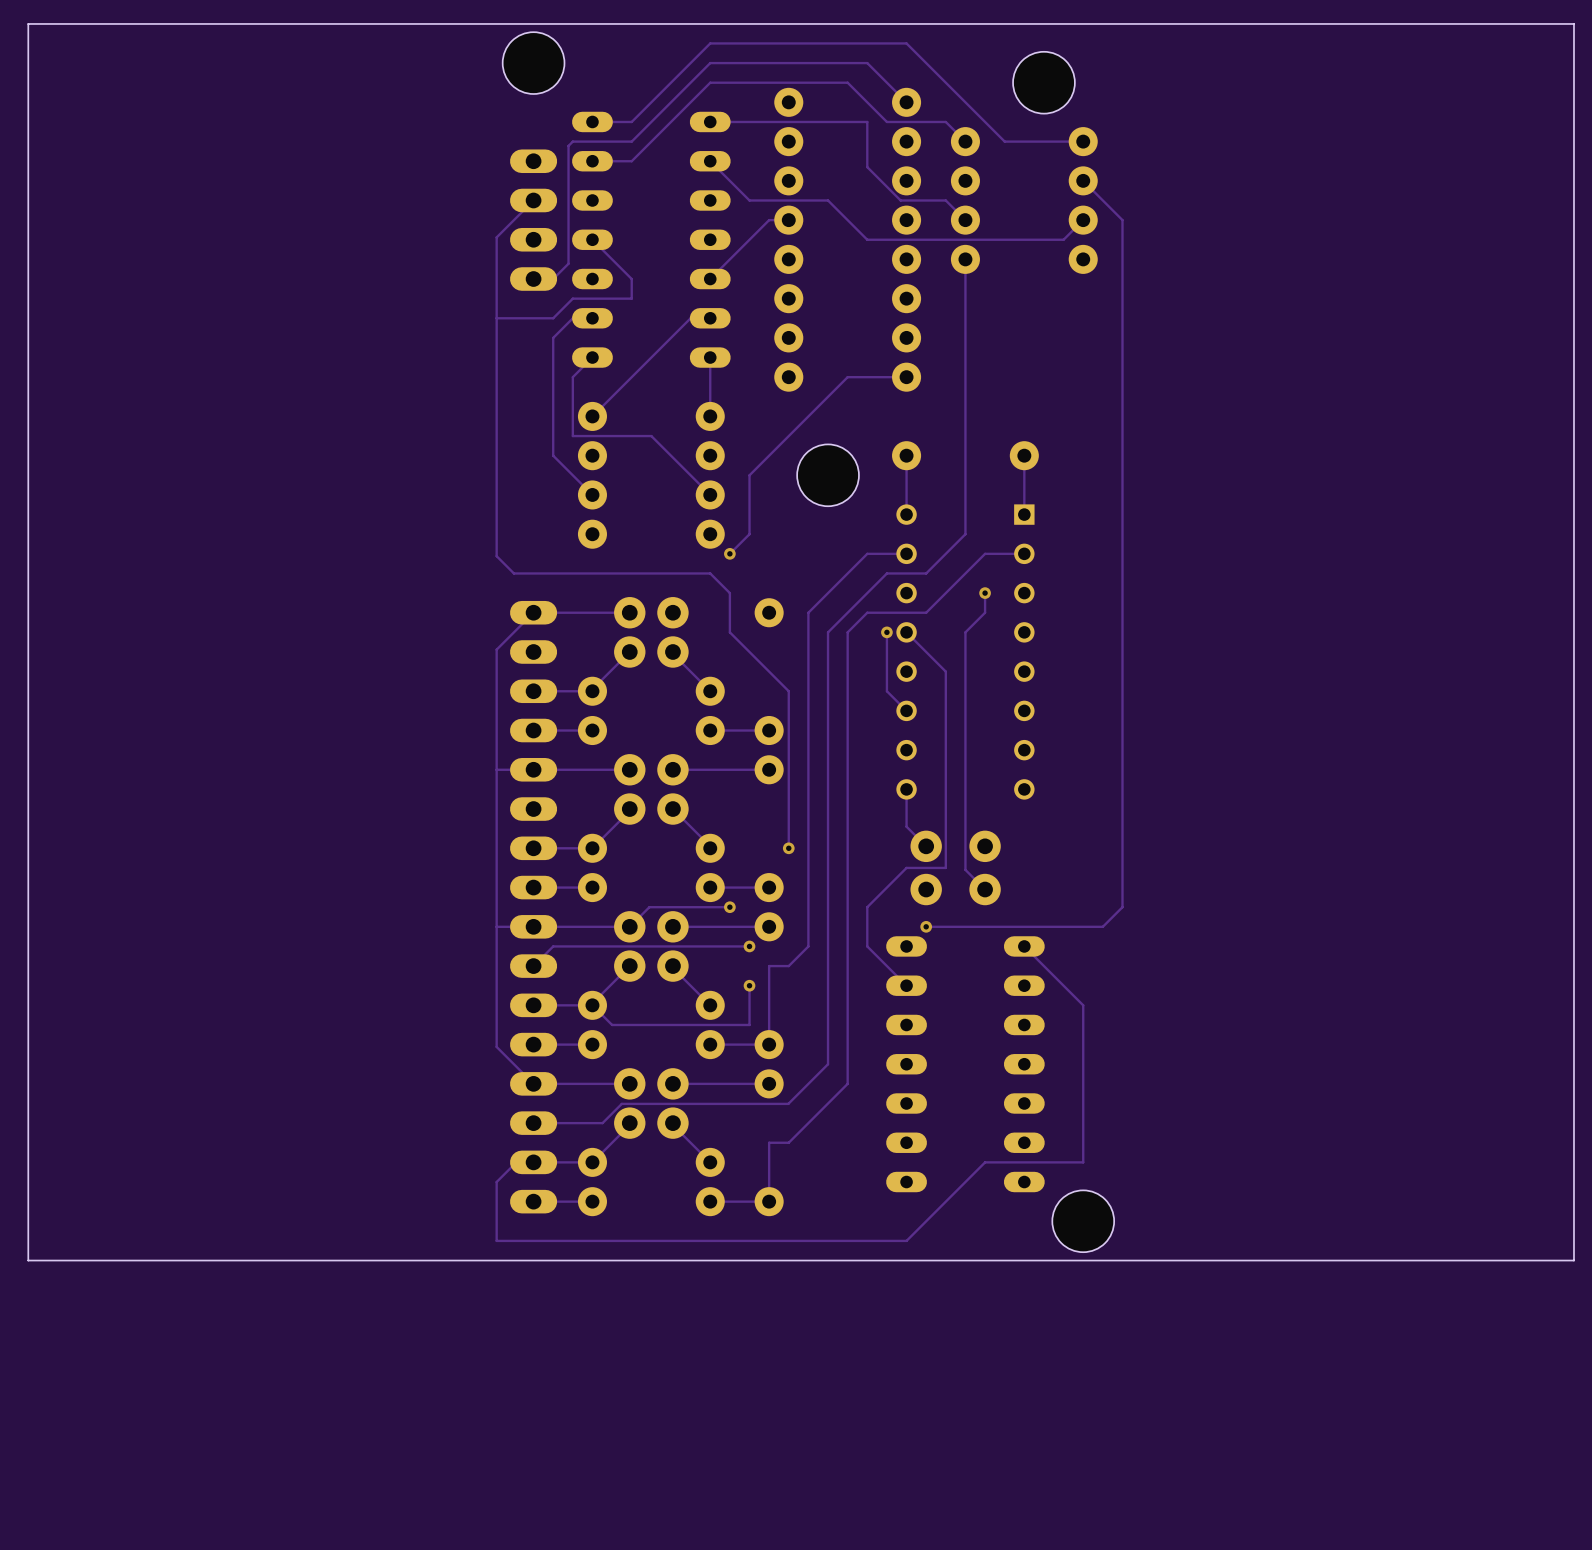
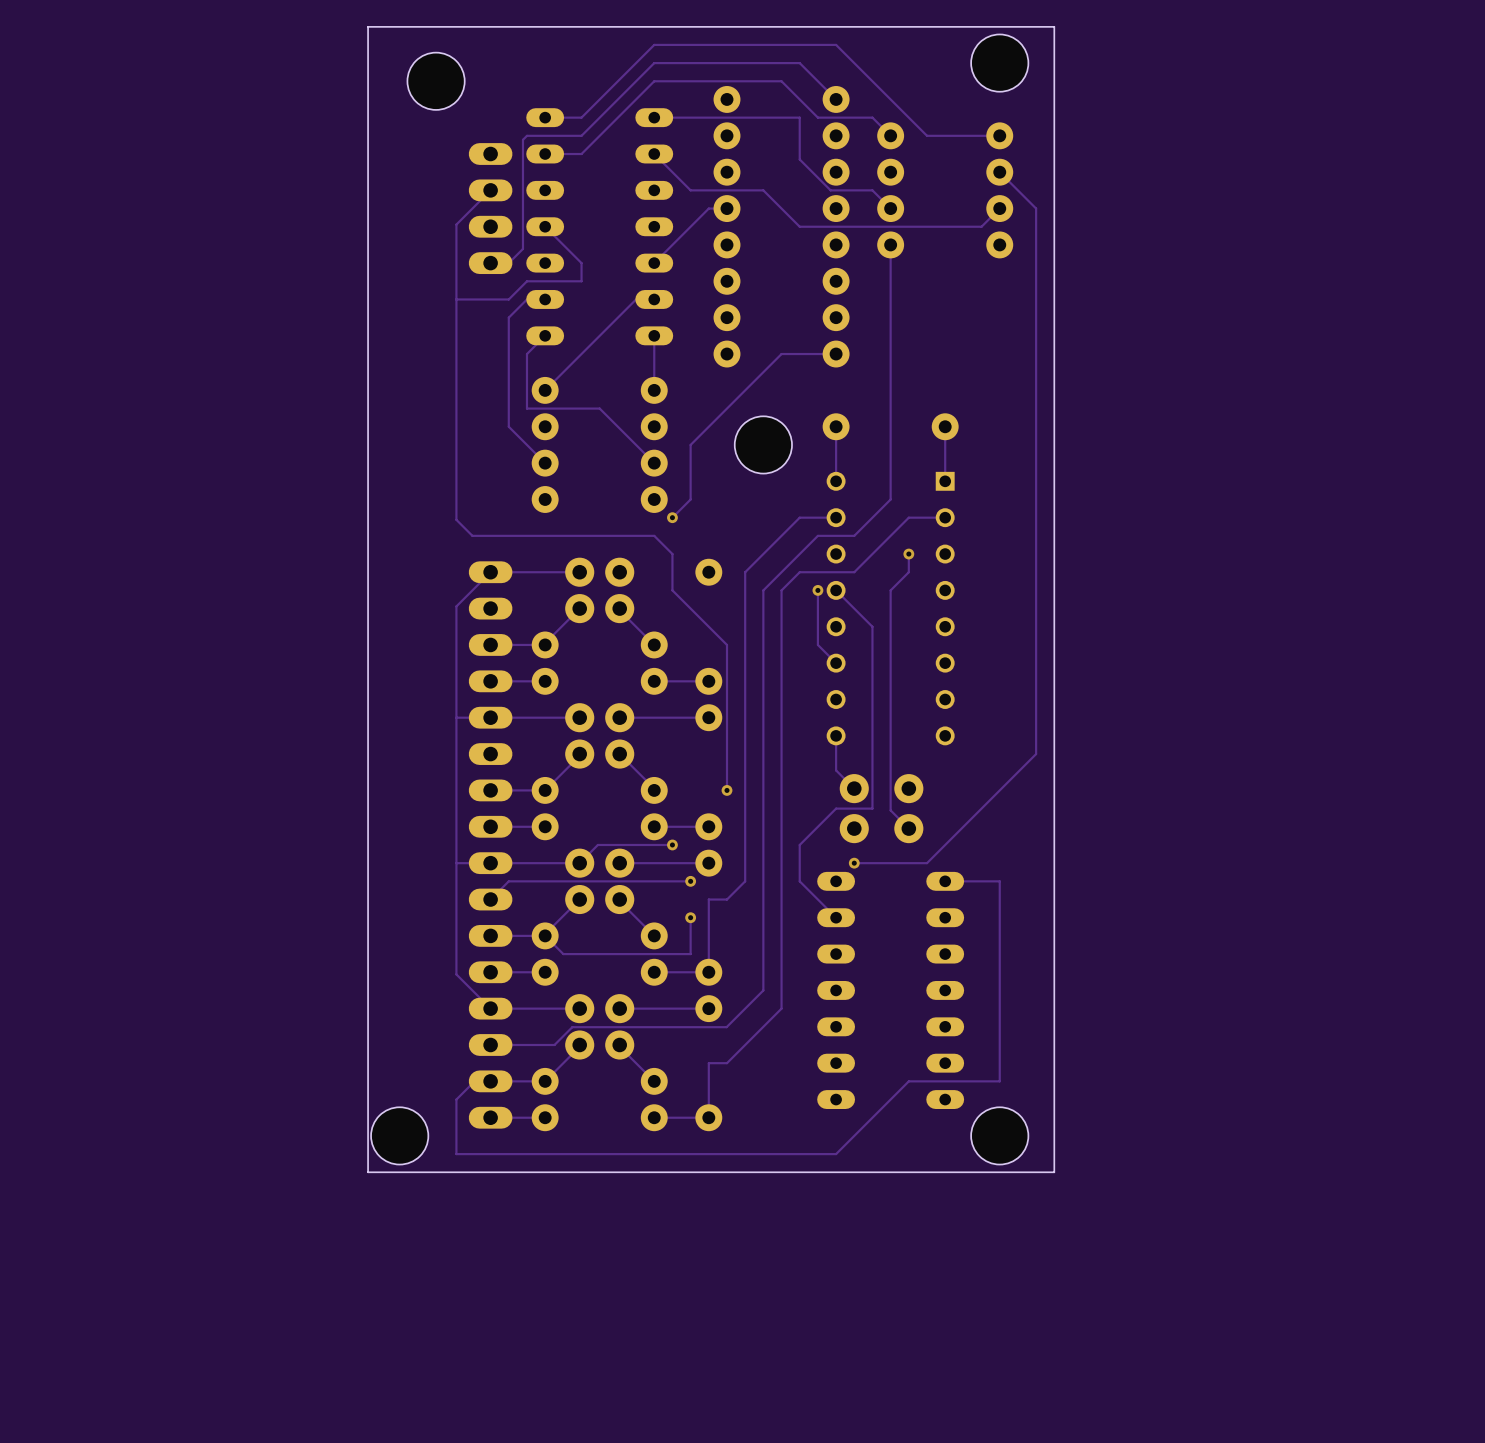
board edge: (401, 23) (28, 23) (28, 1260) (401, 1260) -> (368, 26) (368, 1172)
board edge: (1142, 23) (1573, 23) (1573, 1260) (1142, 1260) -> (1054, 26) (1054, 1172)
hole position: (533, 63) -> (436, 81)
hole position: (1043, 82) -> (999, 63)
track: (1122, 809) (1122, 907) (1102, 926) (1004, 926) -> (1036, 754) (927, 863)
track: (1024, 946) (1083, 1005) -> (945, 881) (999, 881) (999, 935)
hole: none -> (399, 1135)

